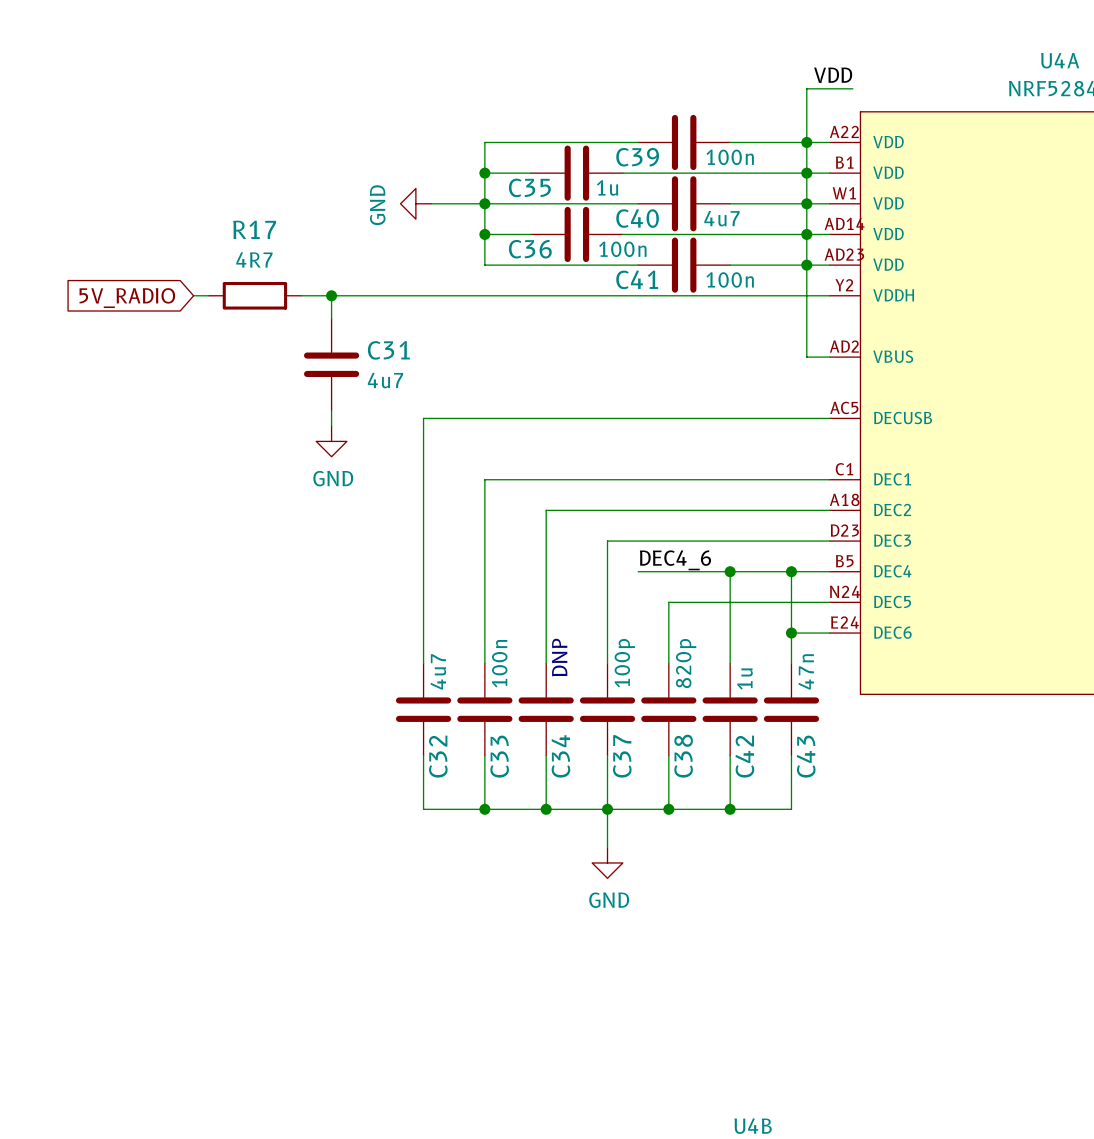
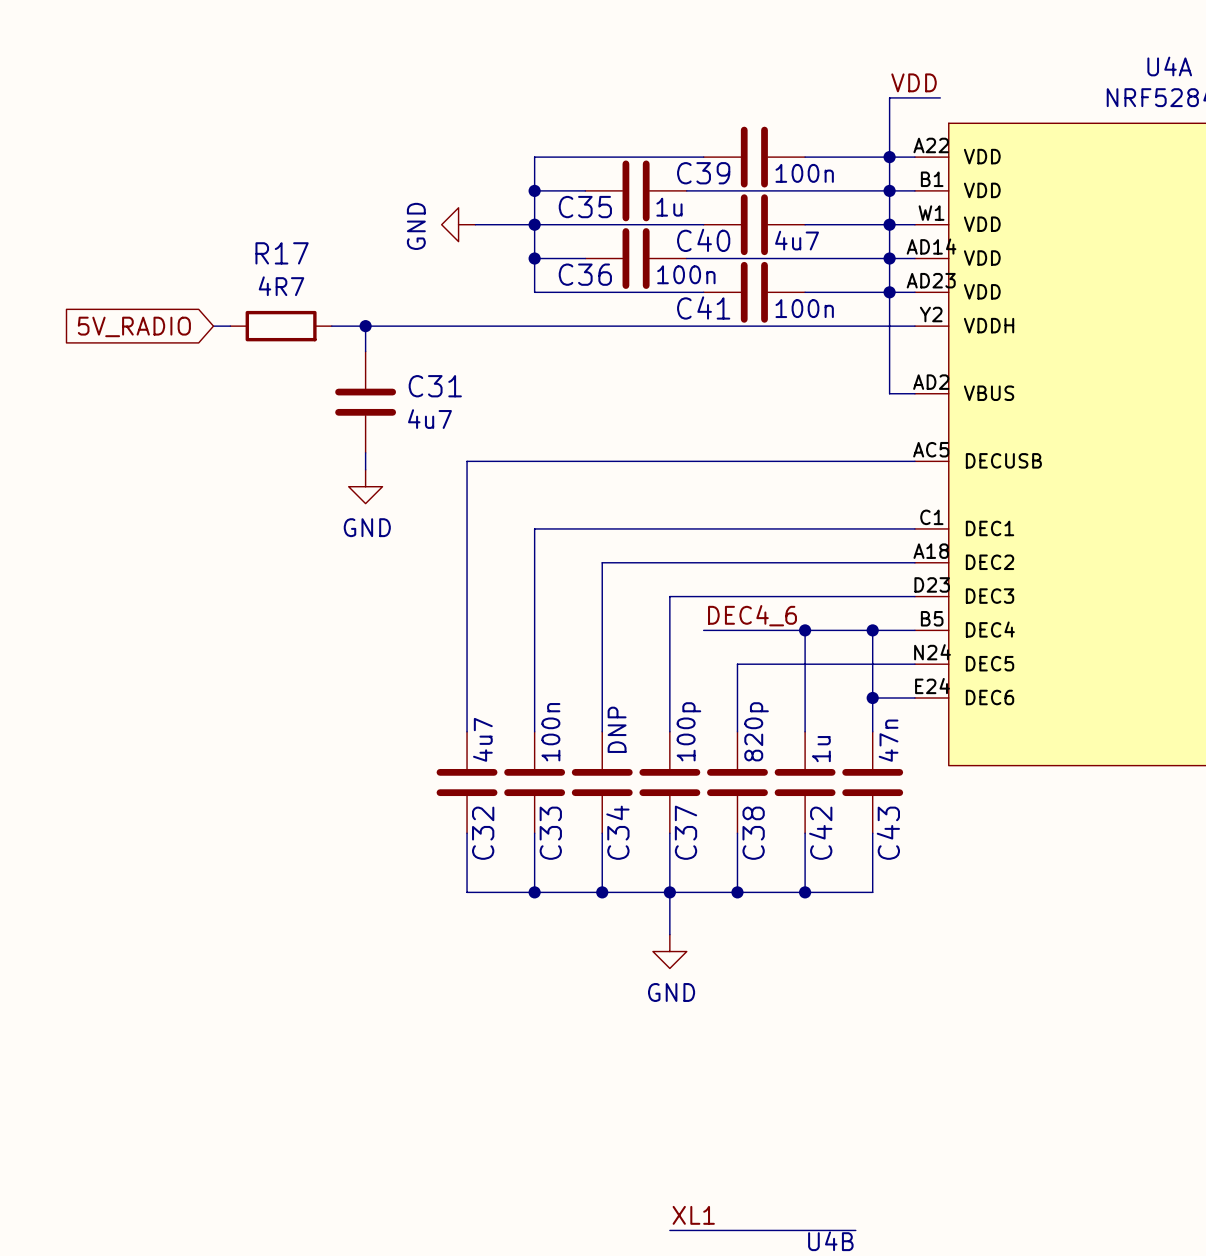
label: none -> XL1 (693, 1215)
wire: none -> (669, 1230) (855, 1230)

